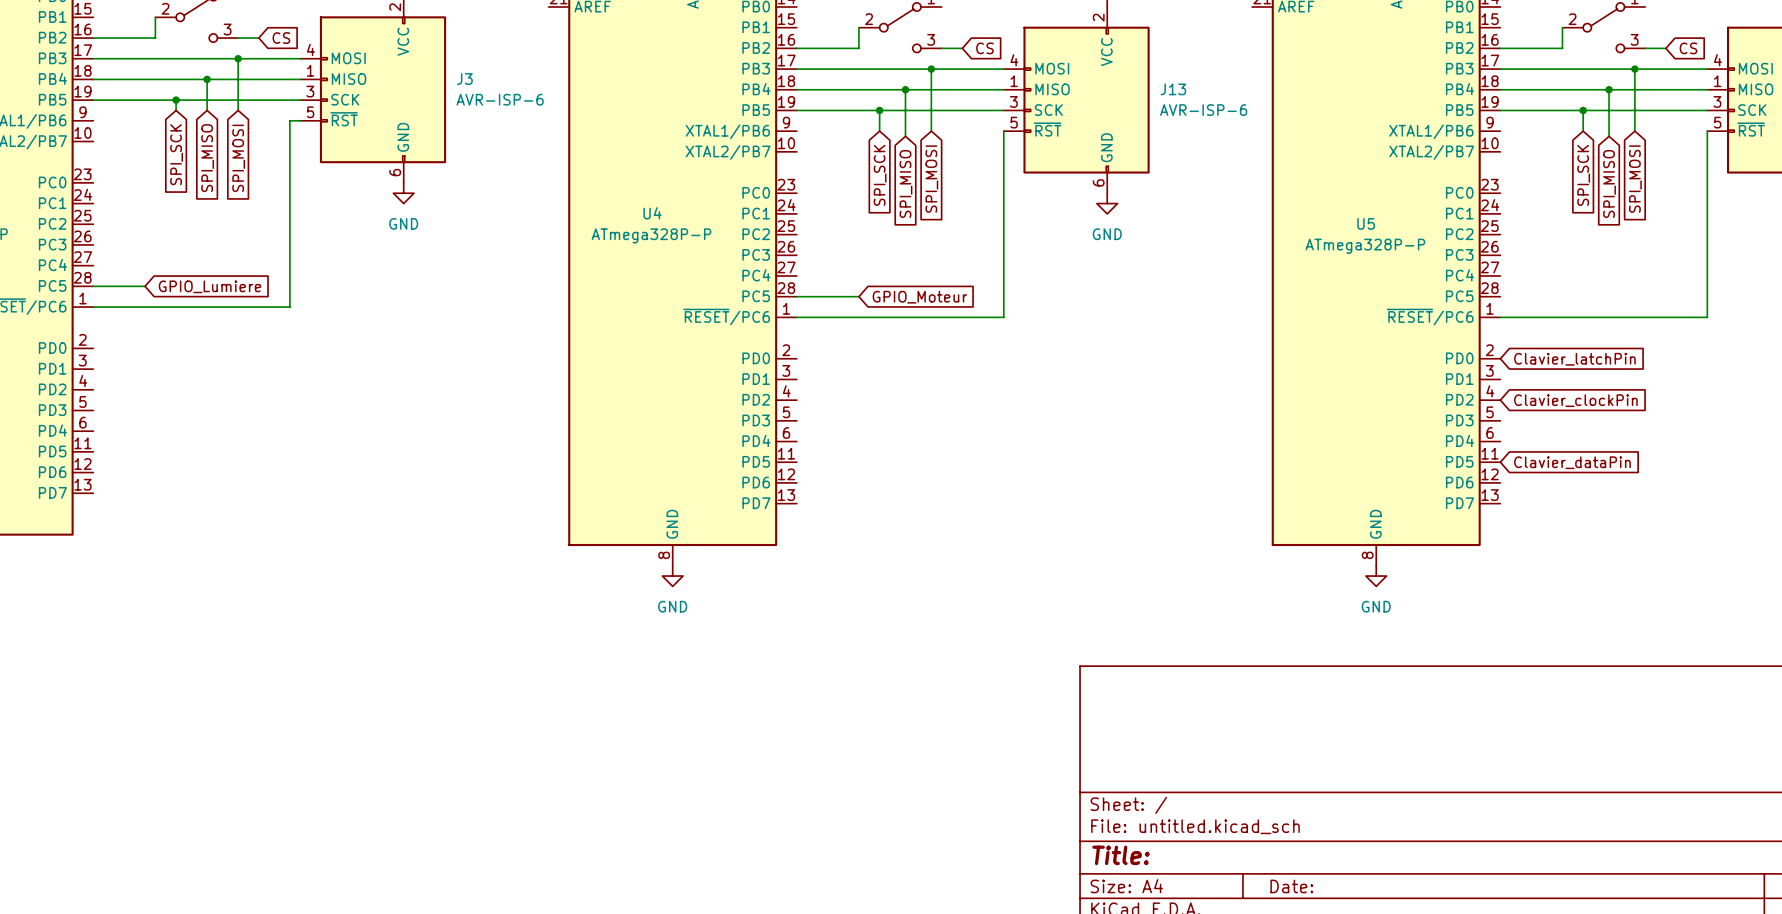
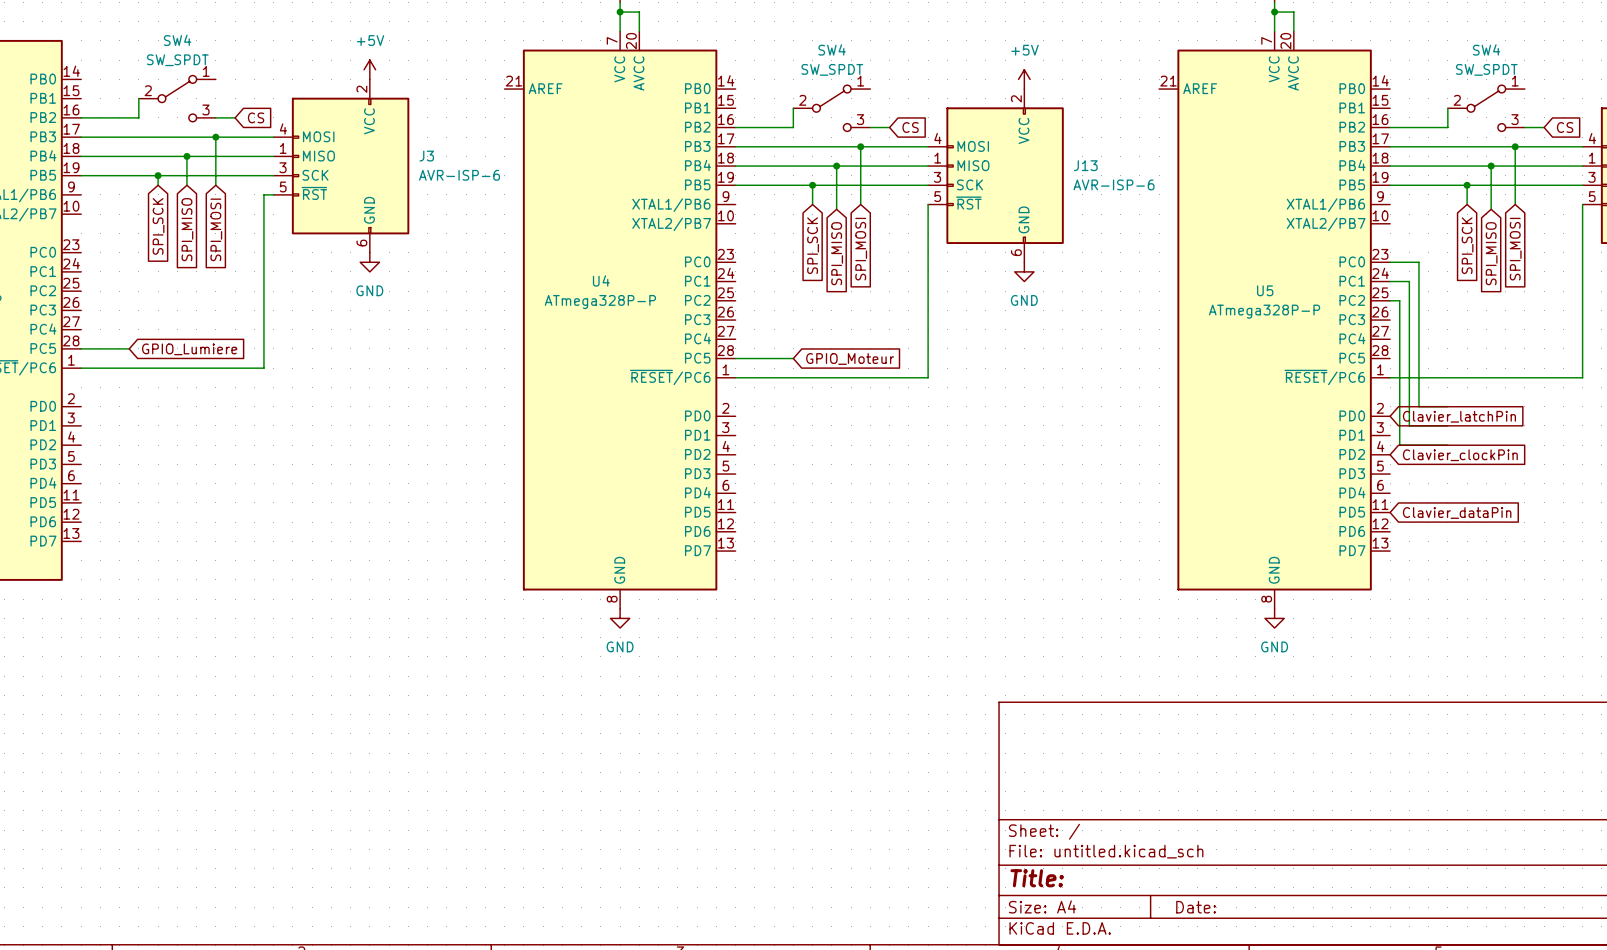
wire: none -> (1390, 262) (1418, 262) (1418, 406) (1447, 406)
wire: none -> (1390, 281) (1409, 281) (1409, 425) (1447, 425)
wire: none -> (1390, 300) (1399, 300) (1399, 445) (1447, 445)

